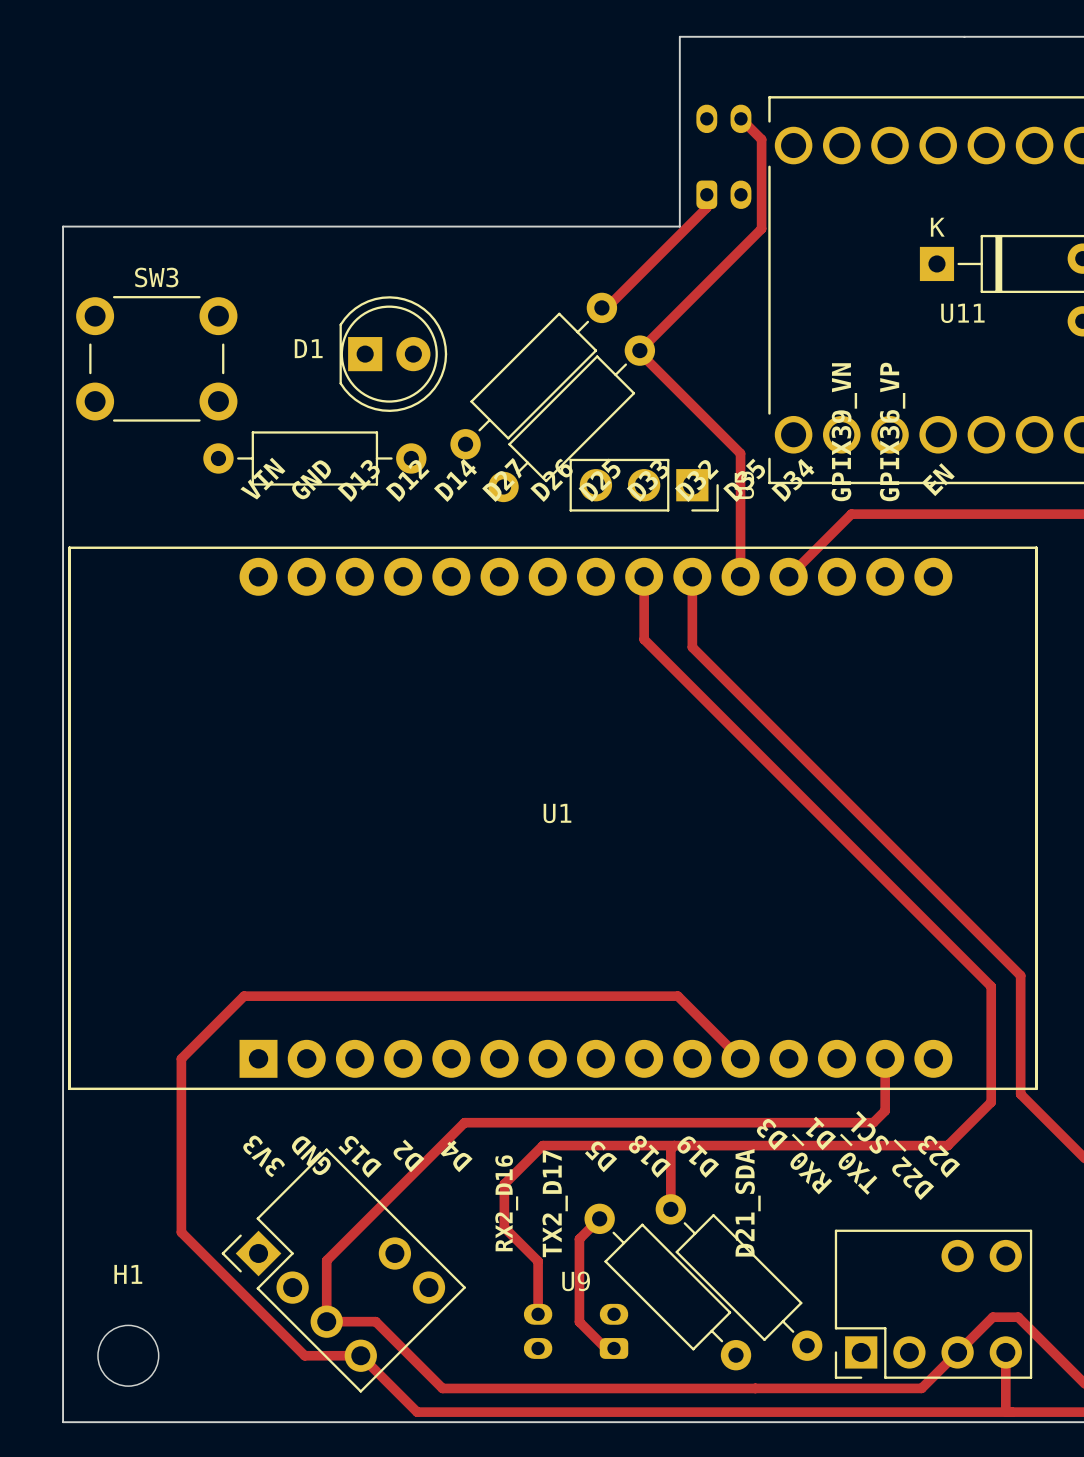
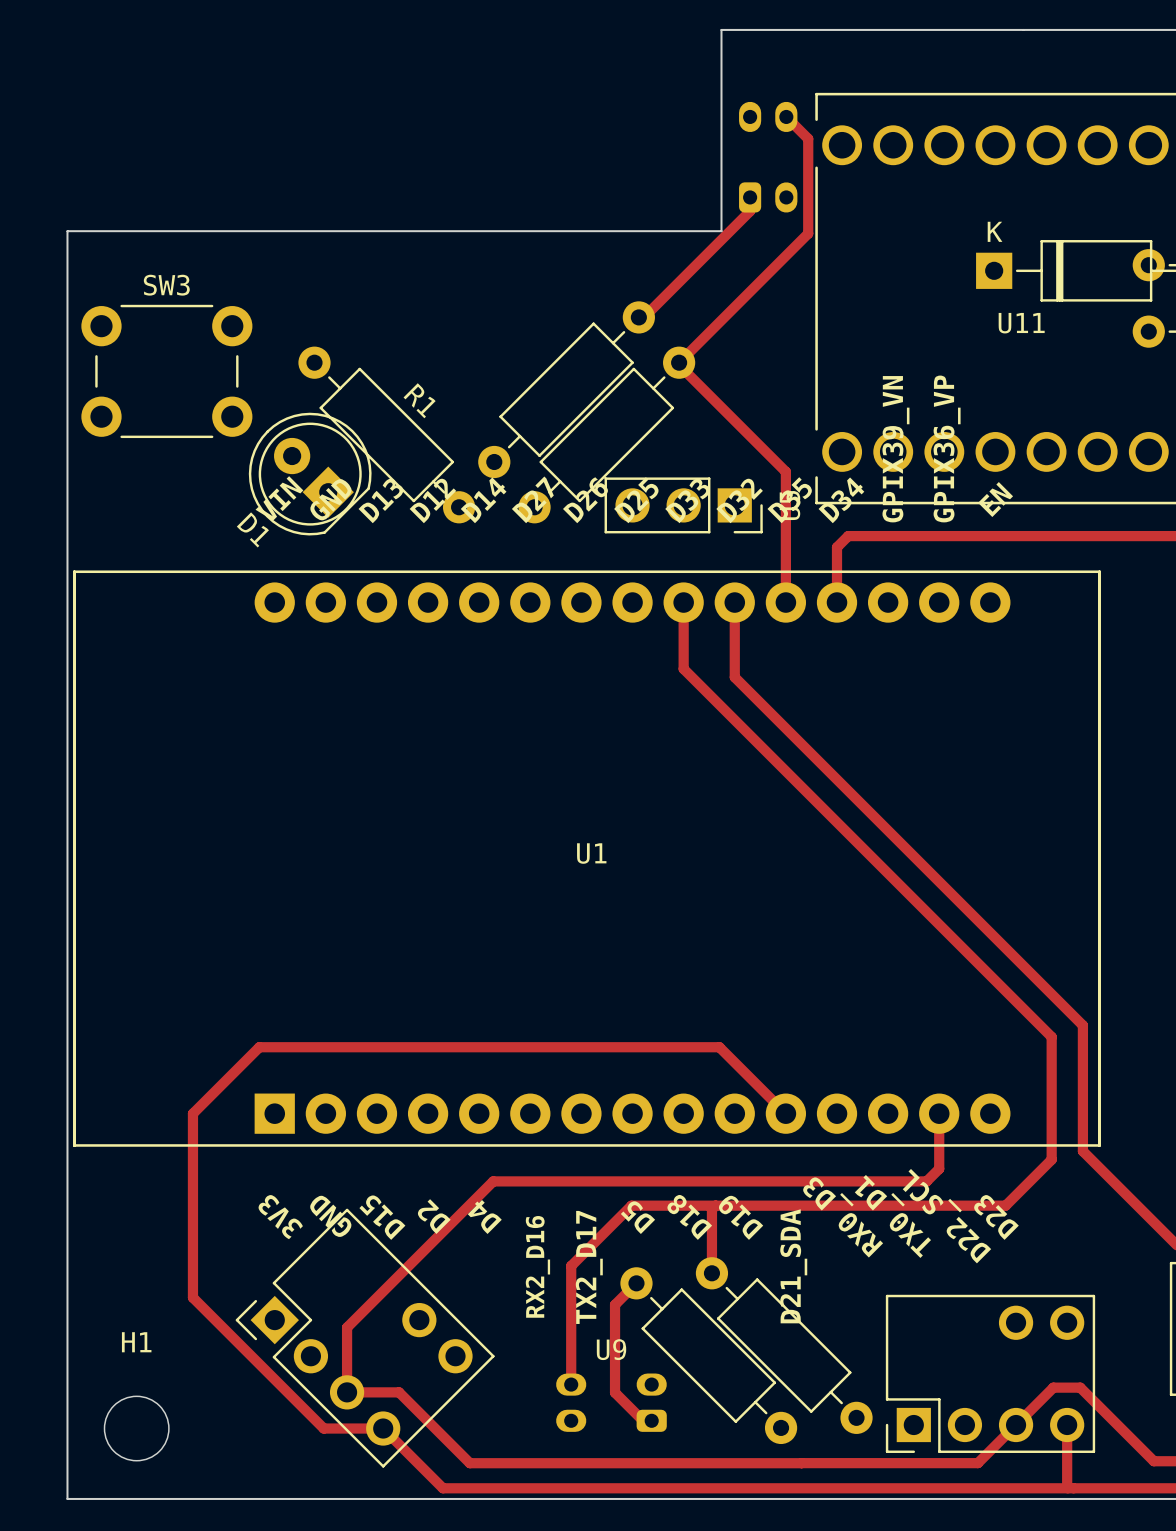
D1 footprint: [339, 296, 448, 412] -> [248, 412, 372, 536]
D1 name position: D1 (308, 348) -> D1 (252, 529)
R1: none -> (386, 434)
part: (314, 458) -> none
track: (851, 514) (788, 576) -> (903, 536) (848, 536) (837, 547) (837, 602)
track: (594, 1145) (542, 1145) (504, 1184) (504, 1227) (538, 1261) -> (631, 1205) (571, 1265) (571, 1328)

